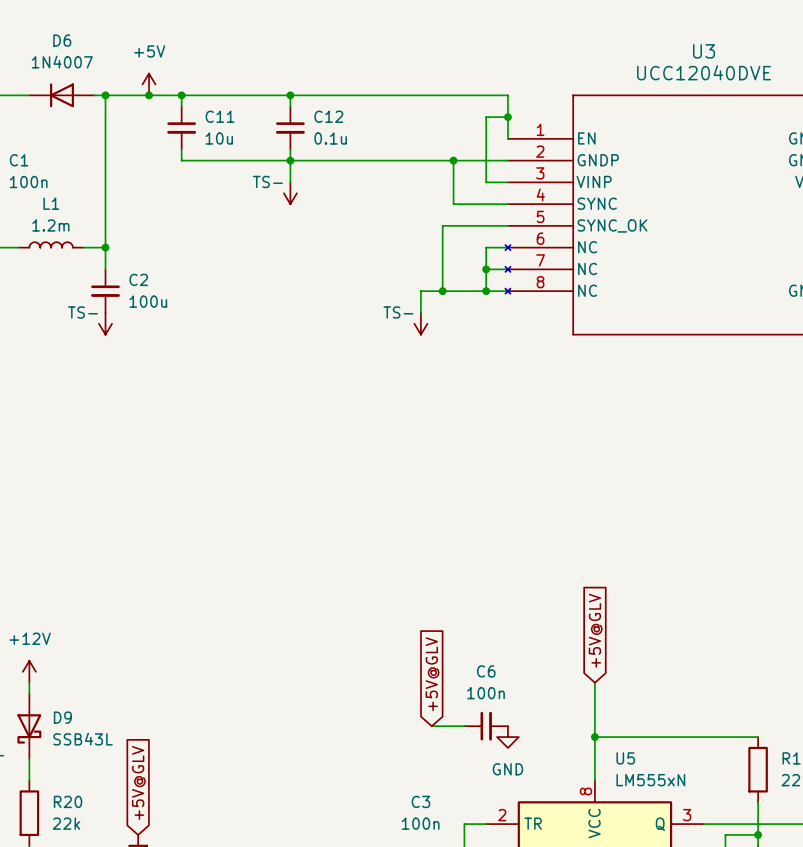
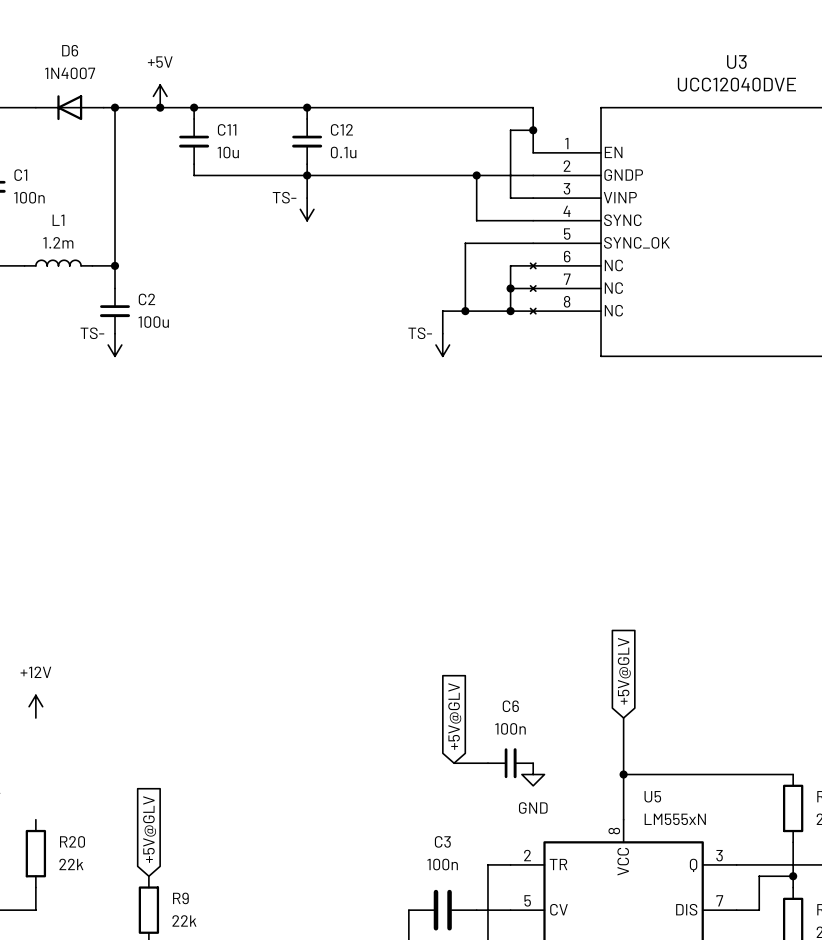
wire: (29, 682) (29, 693) -> none
D9: SSB43L (29, 726) -> none
wire: (29, 758) (29, 780) -> none

